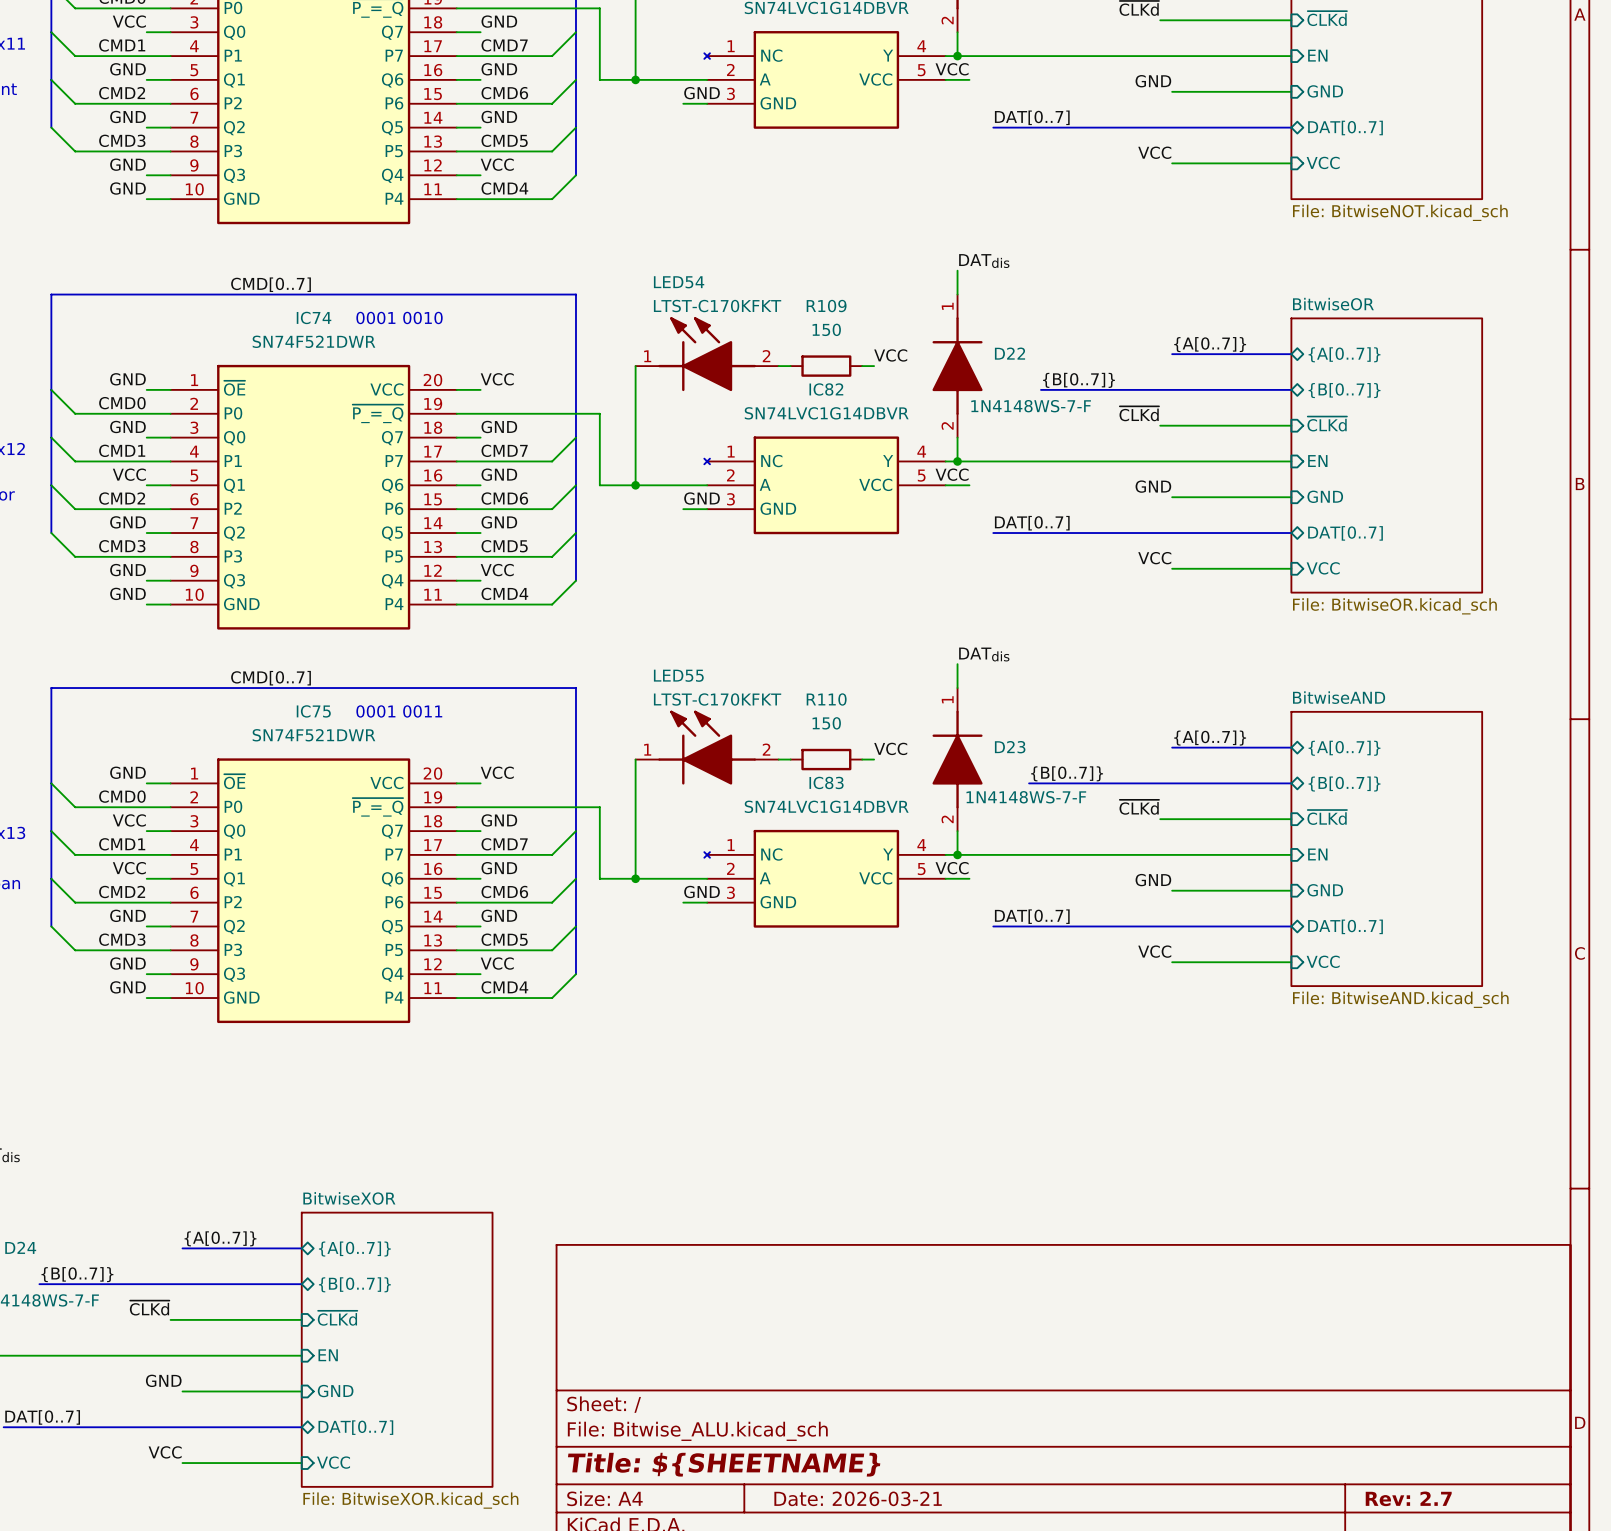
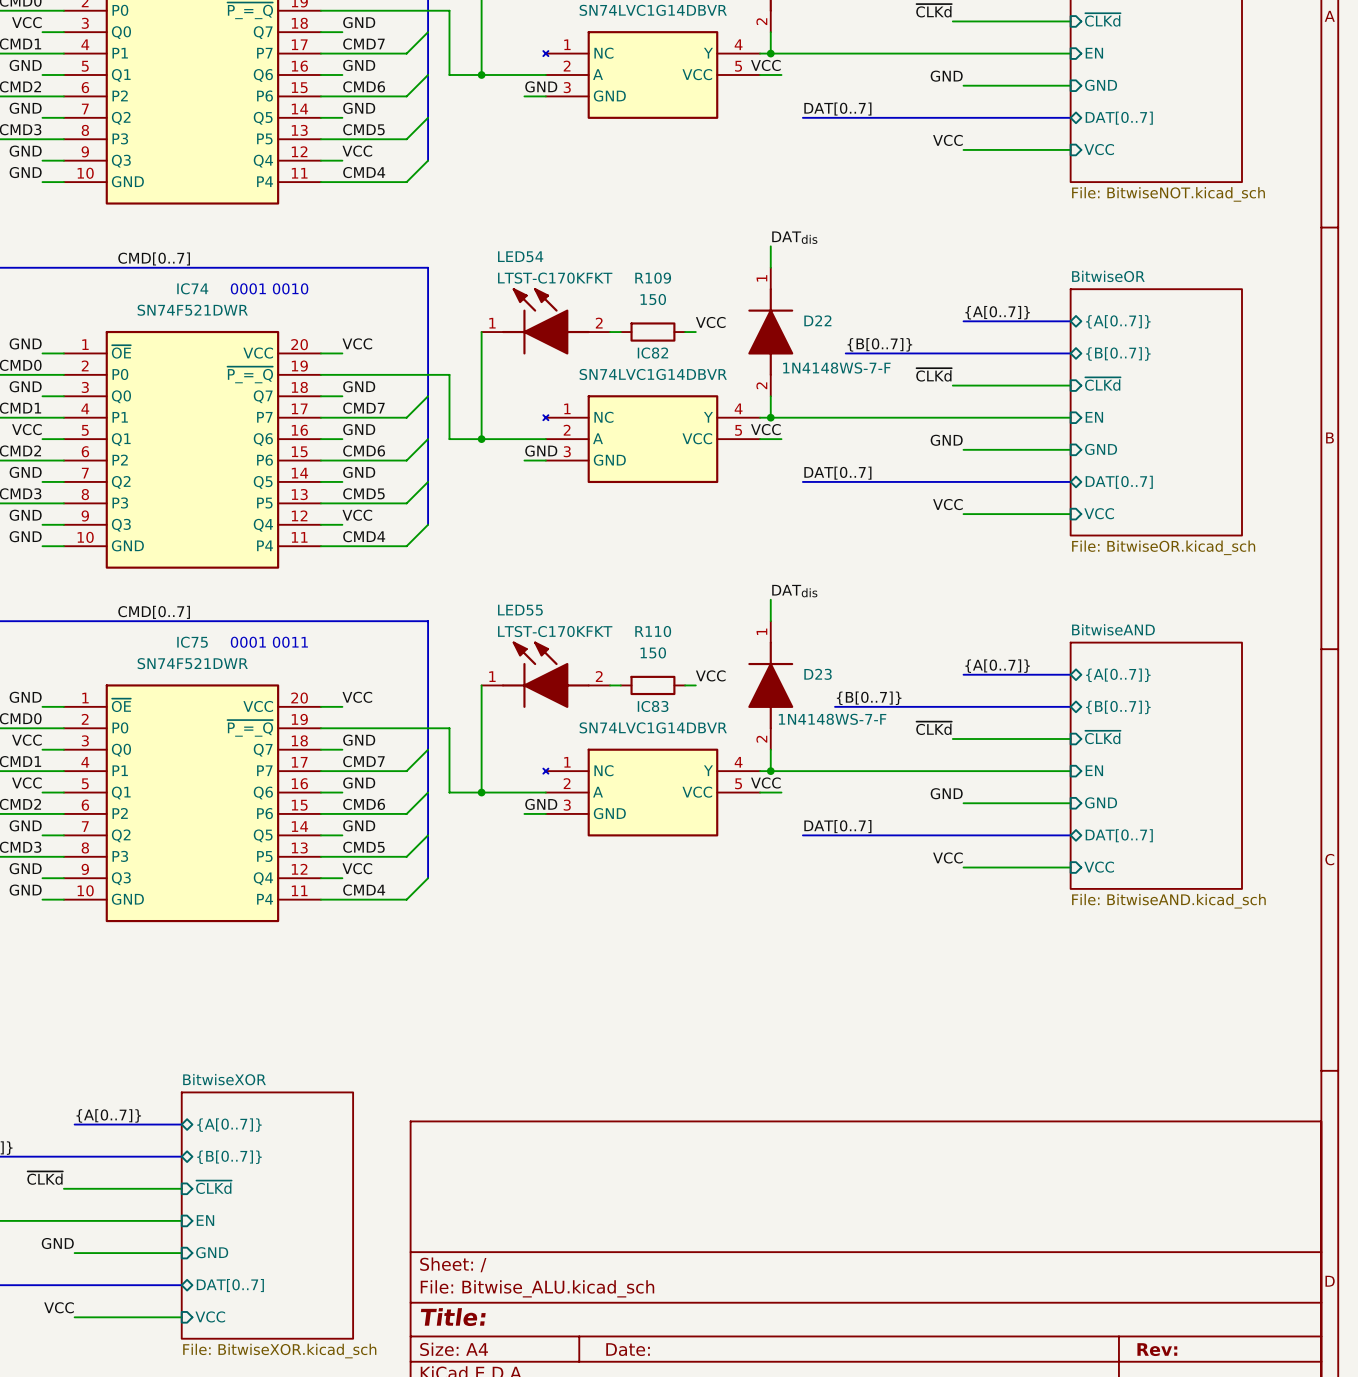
title block: Title: ${SHEETNAME} (724, 1464) -> Title: (453, 1317)
title block: Date: 2026-03-21 (858, 1498) -> Date: (628, 1349)
title block: Rev: 2.7 (1408, 1498) -> Rev: (1157, 1349)

